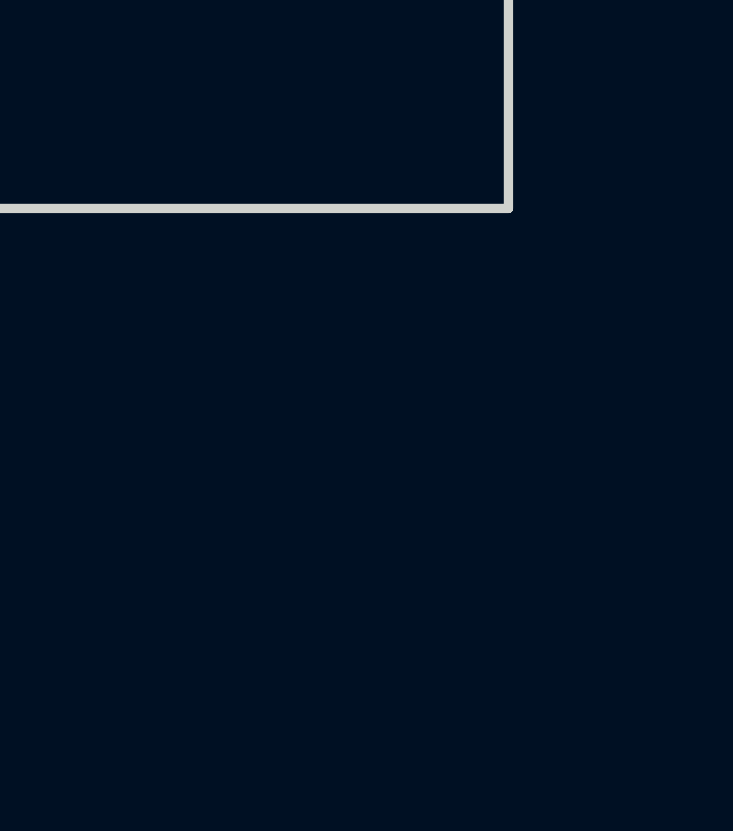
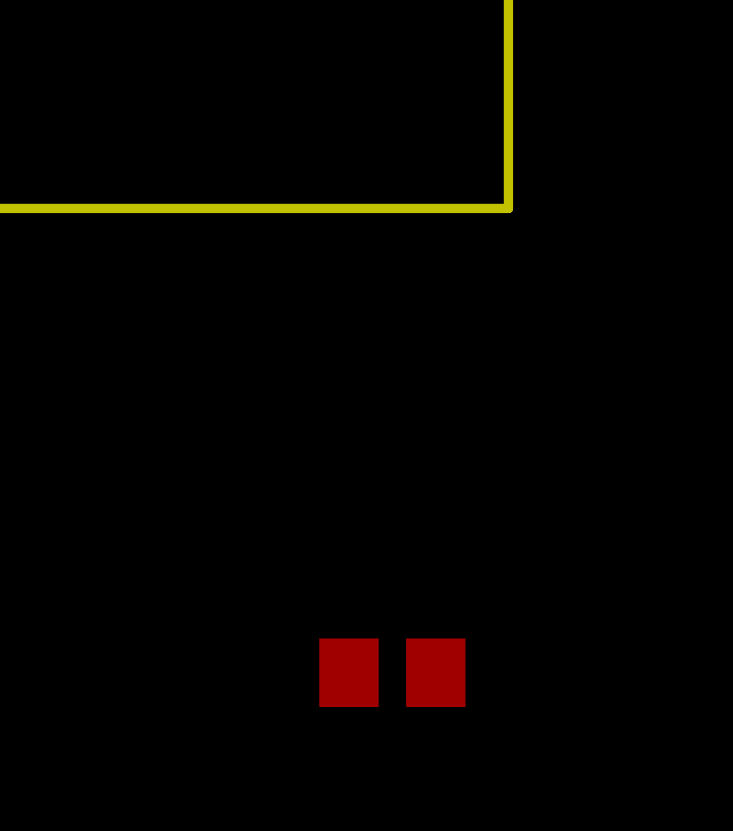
part: none -> (392, 672)

